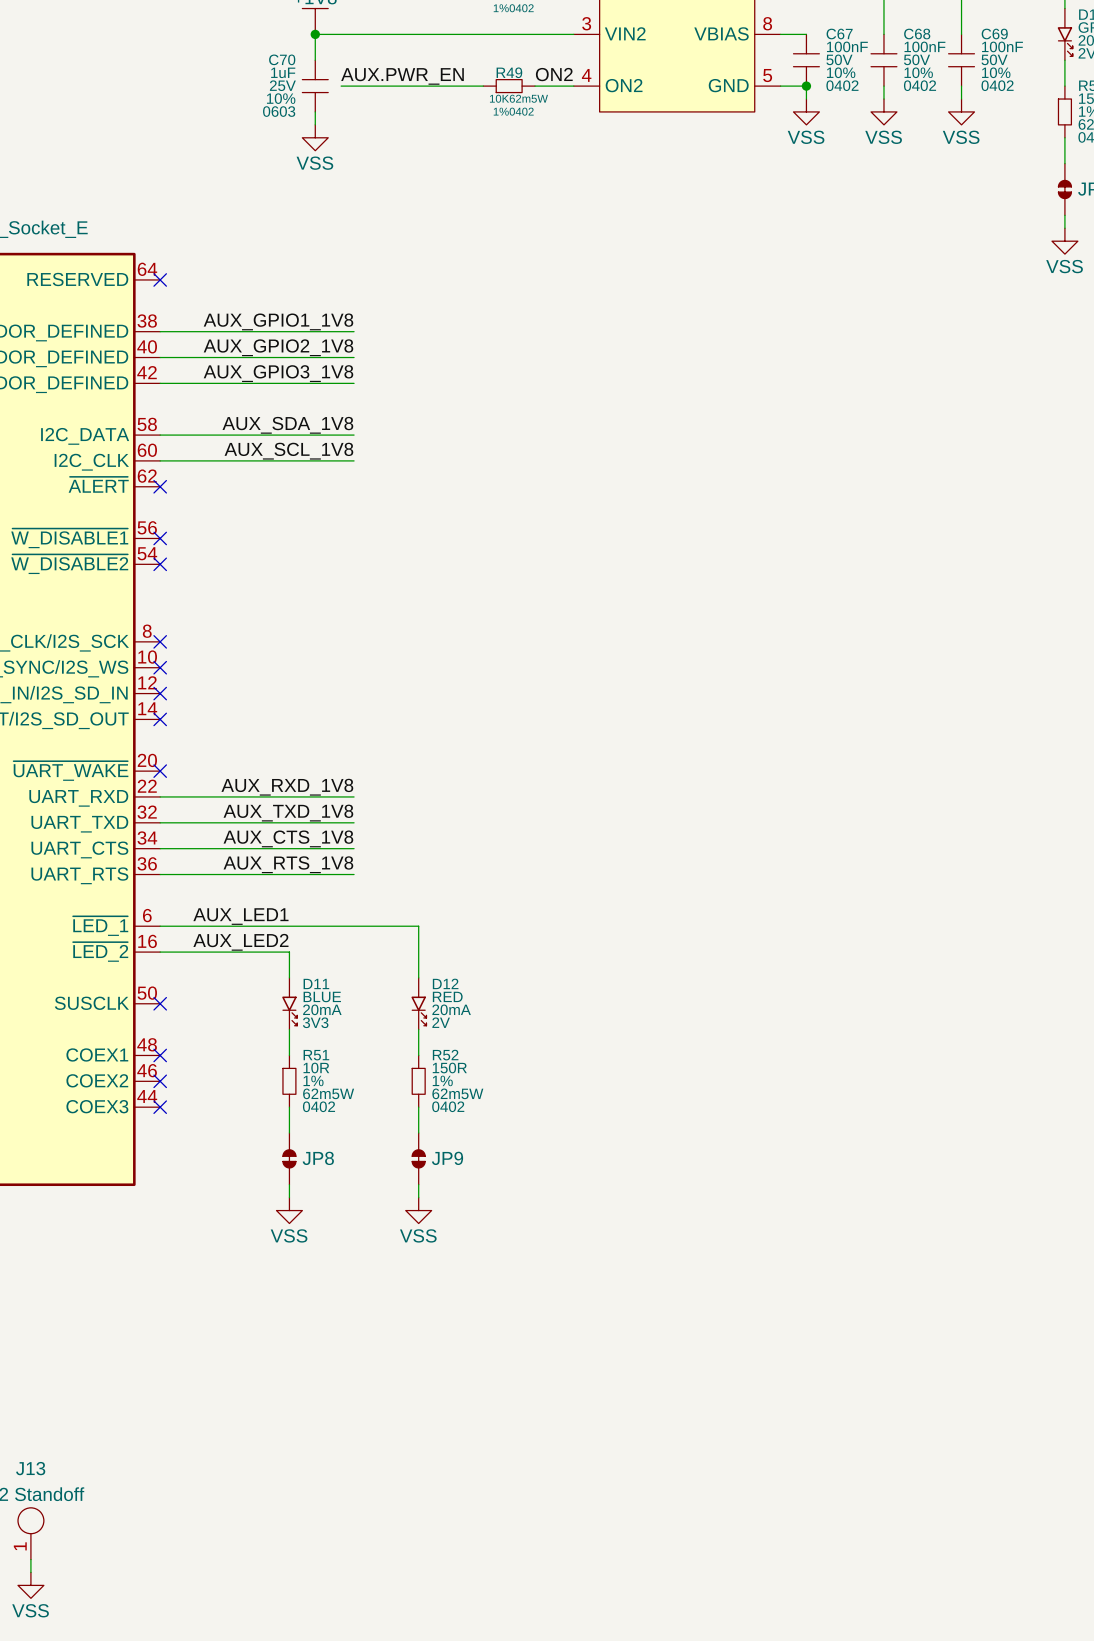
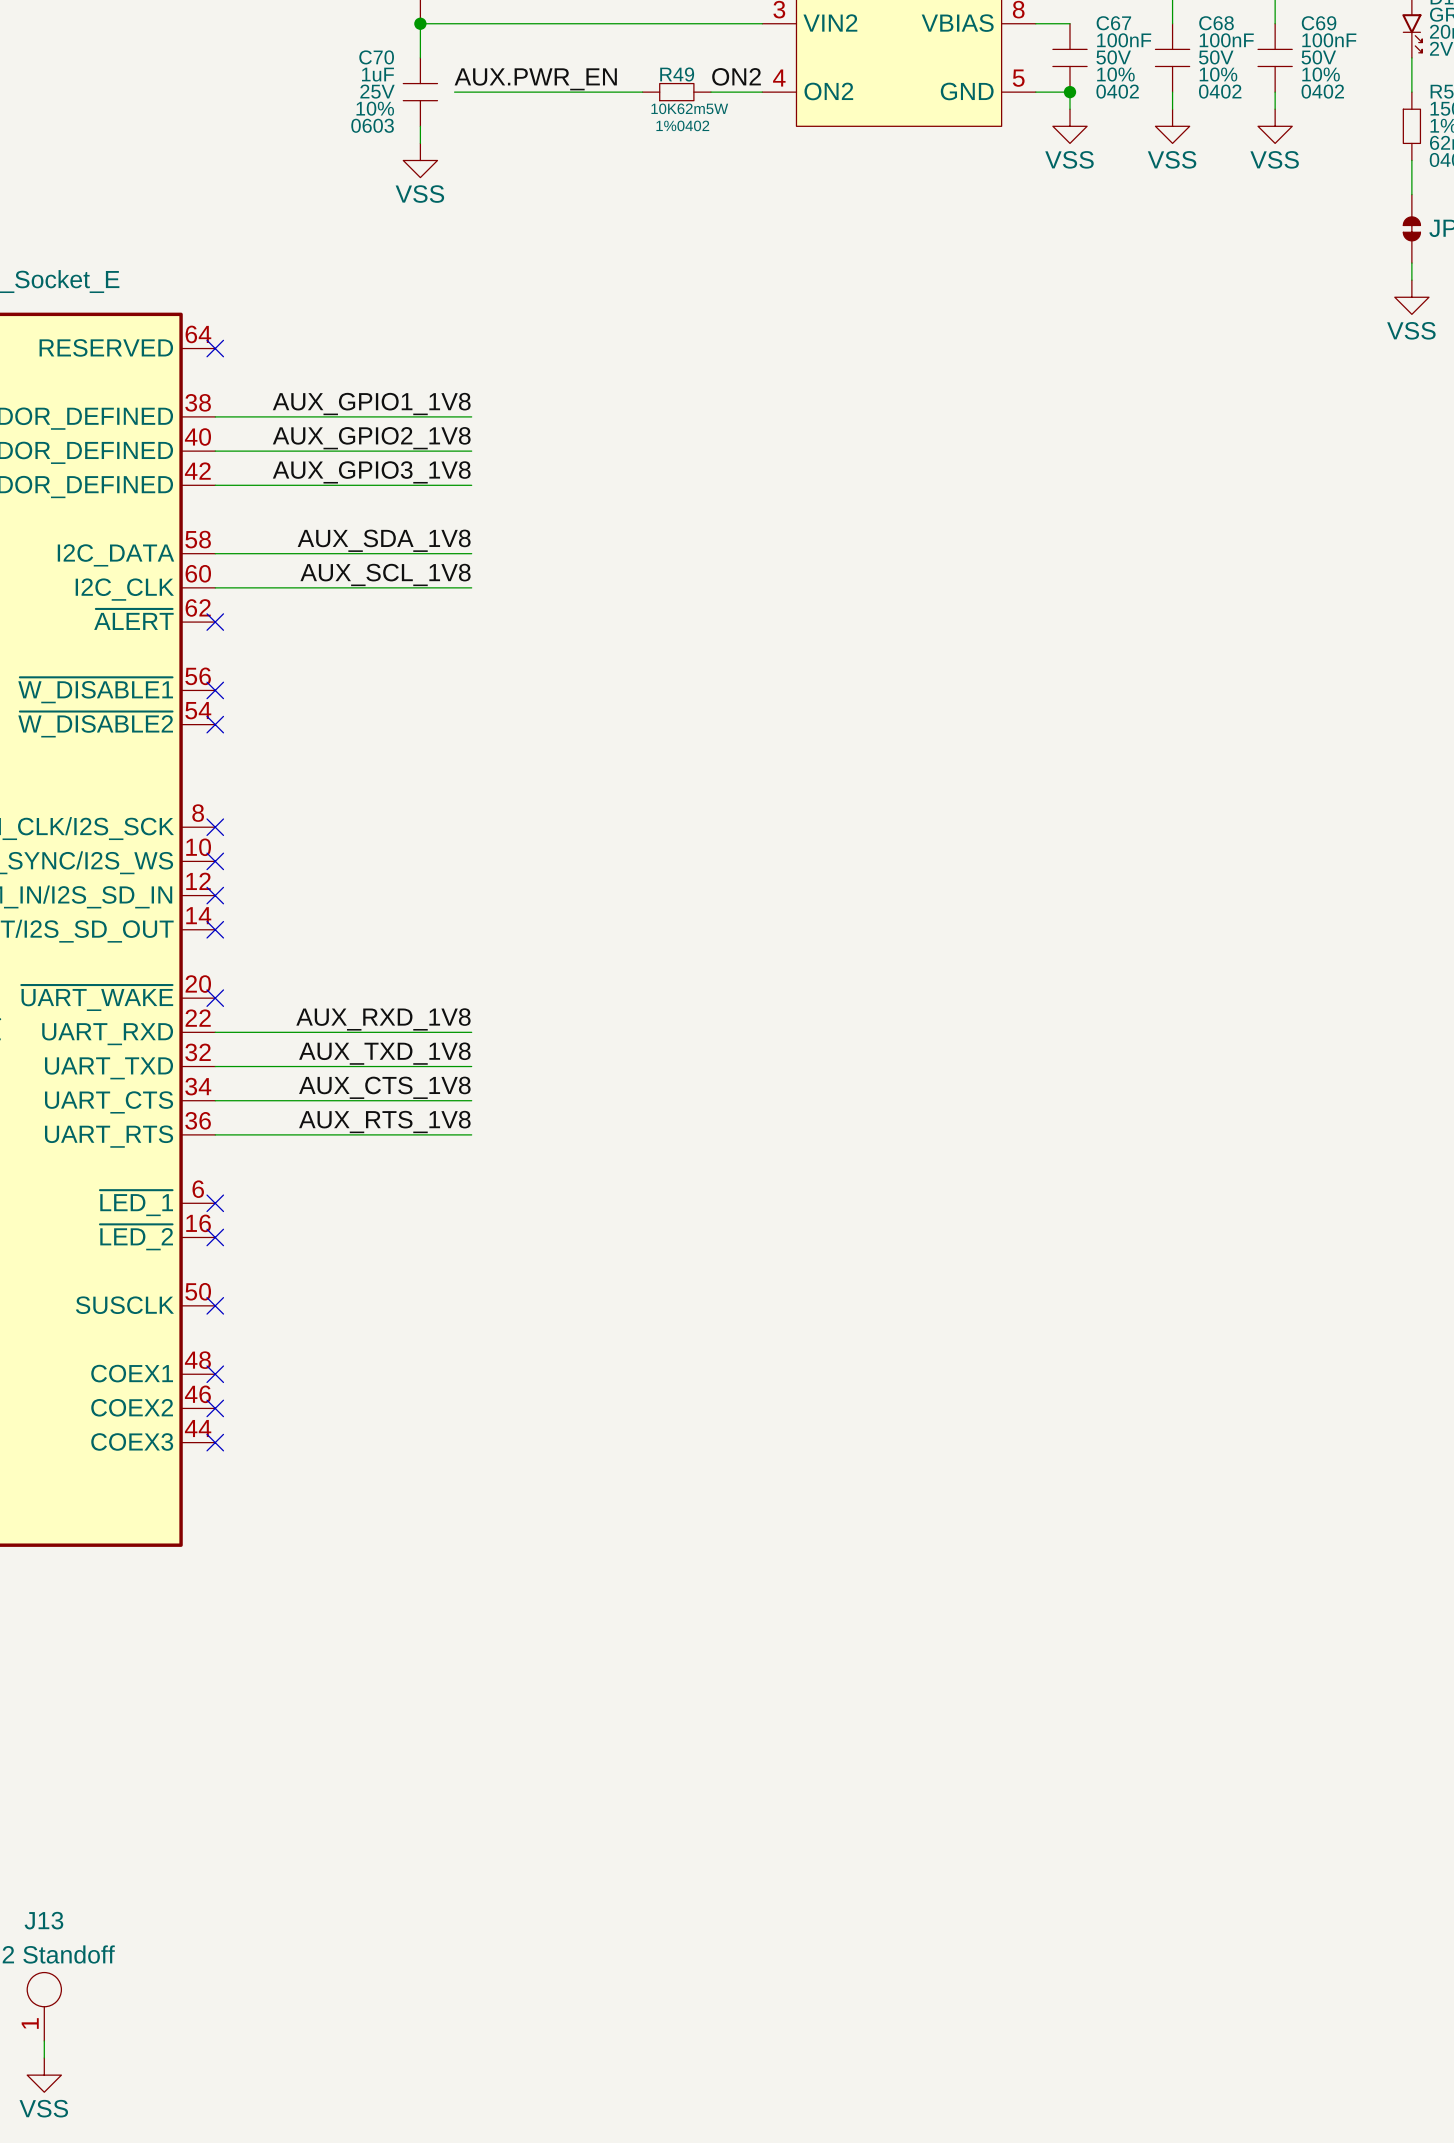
label: AUX_LED1 (240, 916) -> none
wire: (160, 926) (418, 926) (418, 977) -> none
no-connect mark: none -> (215, 1203)
label: AUX_LED2 (240, 942) -> none
wire: (160, 952) (289, 952) (289, 977) -> none
no-connect mark: none -> (215, 1237)
D11: (289, 1003) -> none
D12: (418, 1003) -> none
wire: (289, 1029) (289, 1055) -> none
wire: (418, 1029) (418, 1055) -> none
R51: 10R (289, 1081) -> none
R52: 150R (418, 1081) -> none
wire: (289, 1107) (289, 1133) -> none
wire: (418, 1107) (418, 1133) -> none
JP8: (289, 1158) -> none
JP9: (418, 1158) -> none
wire: (289, 1184) (289, 1197) -> none
wire: (418, 1184) (418, 1197) -> none
power symbol: VSS (289, 1210) -> none
power symbol: VSS (418, 1210) -> none

